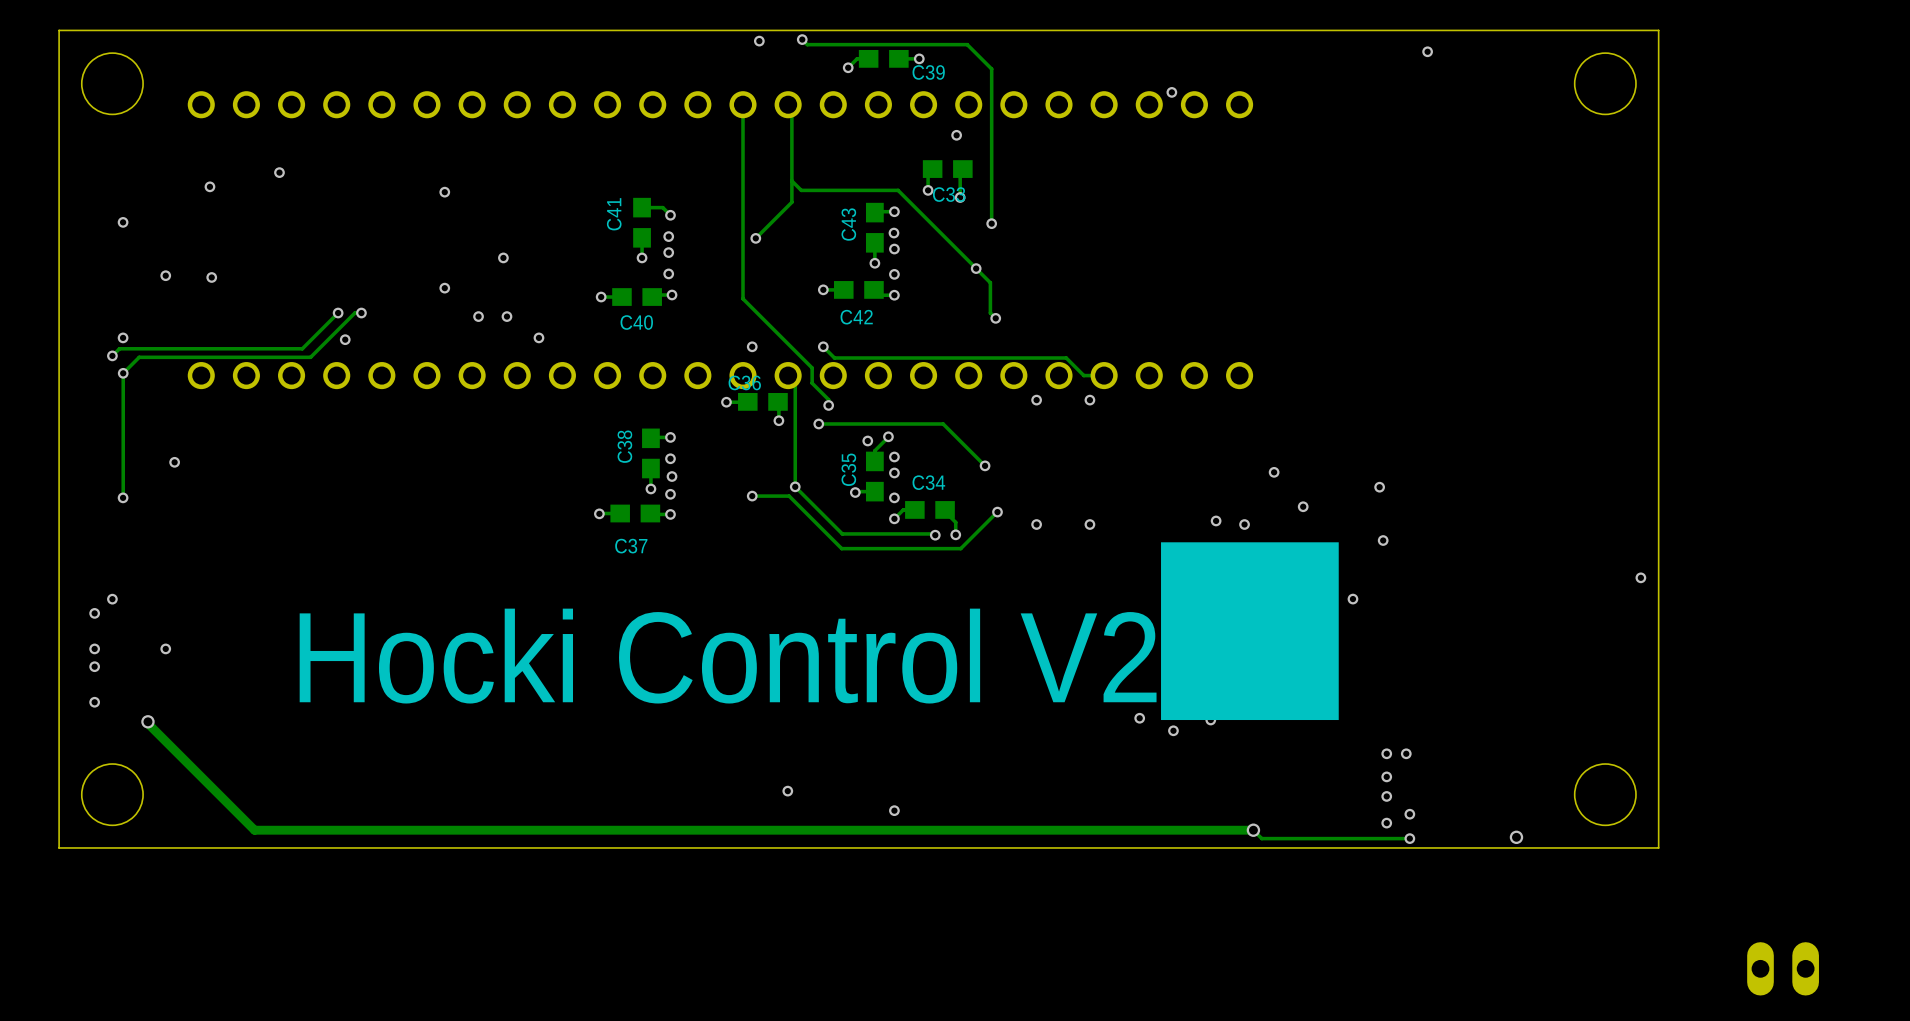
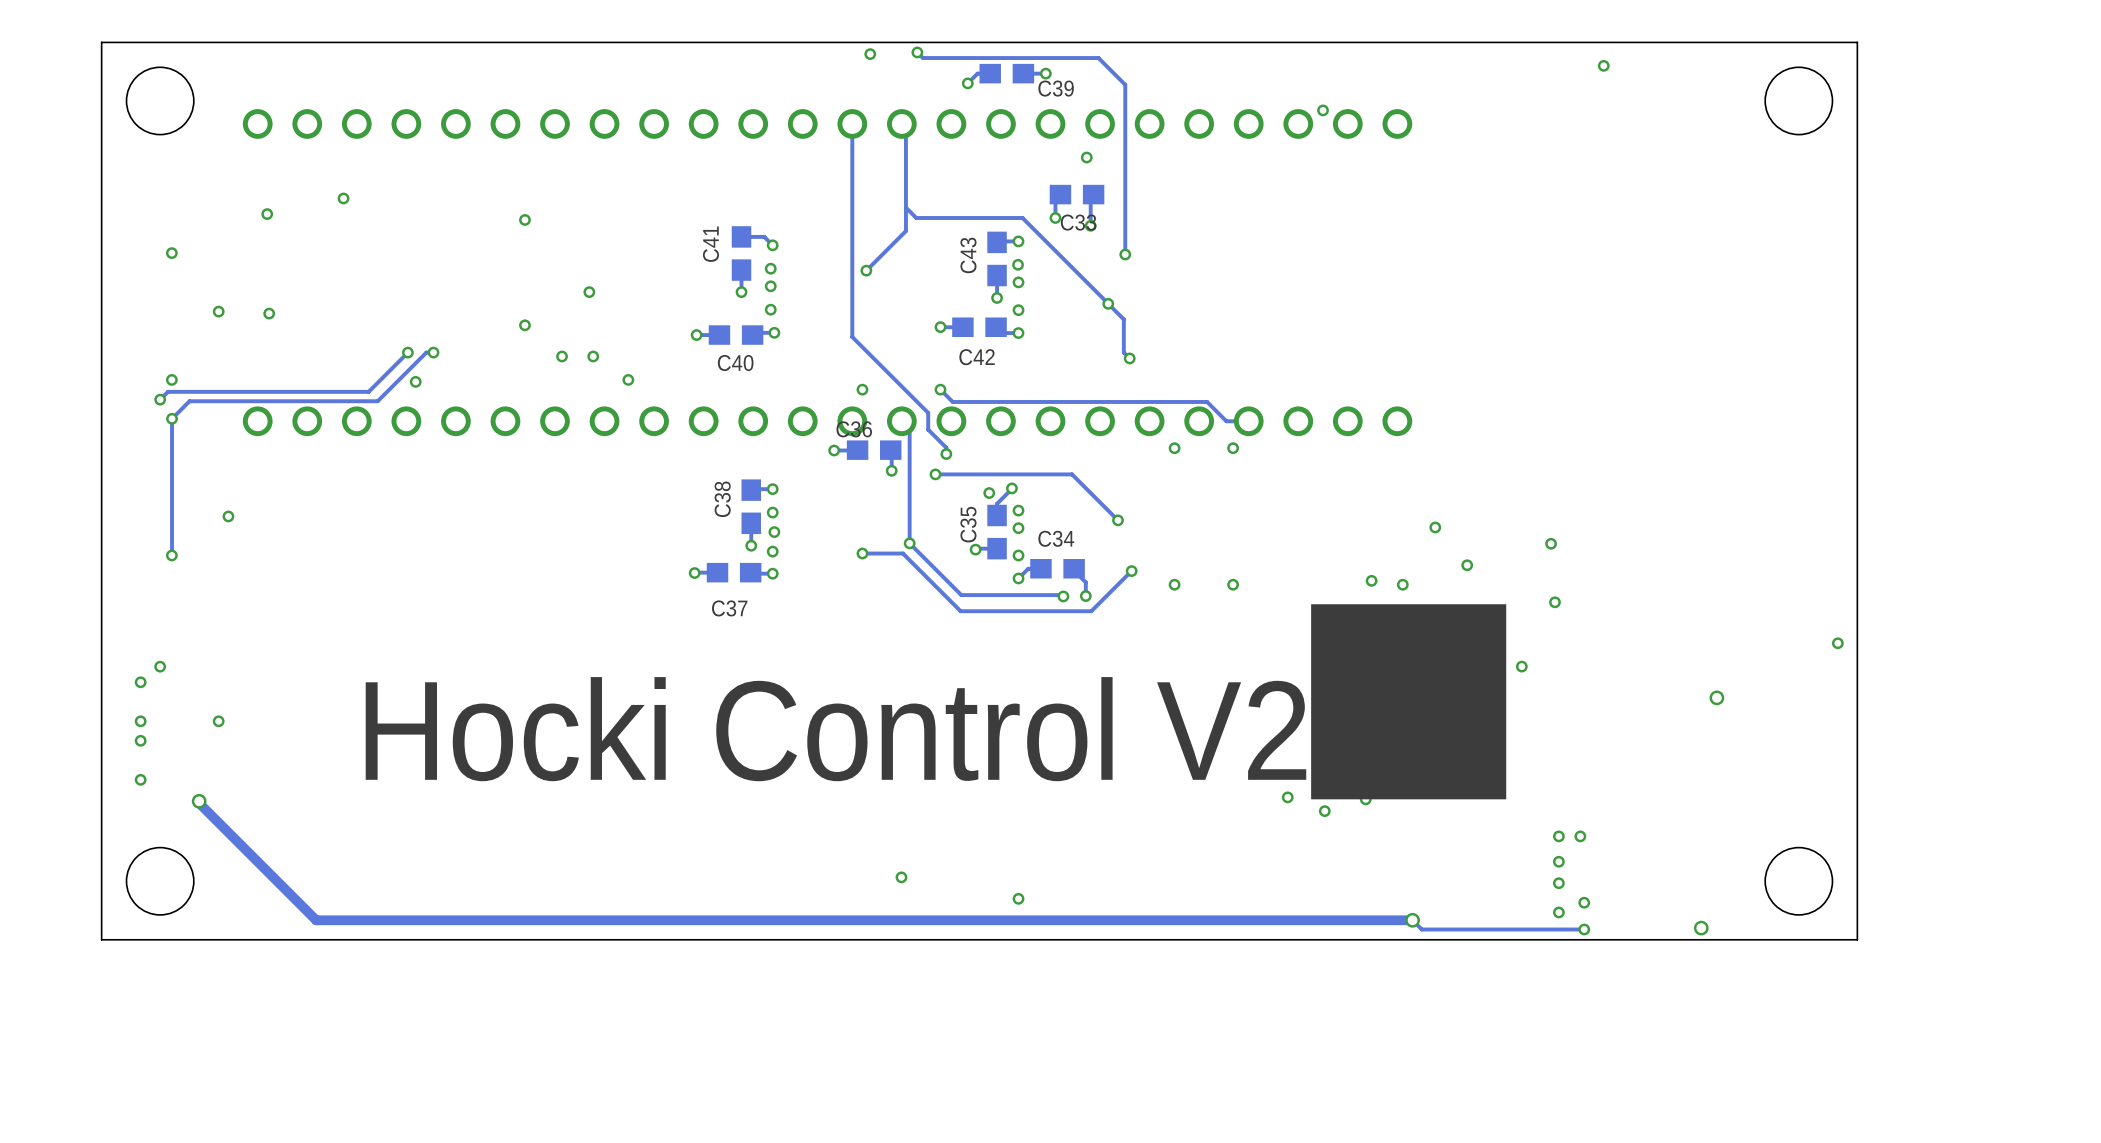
via: none -> (1716, 697)
part: (1783, 968) -> none

